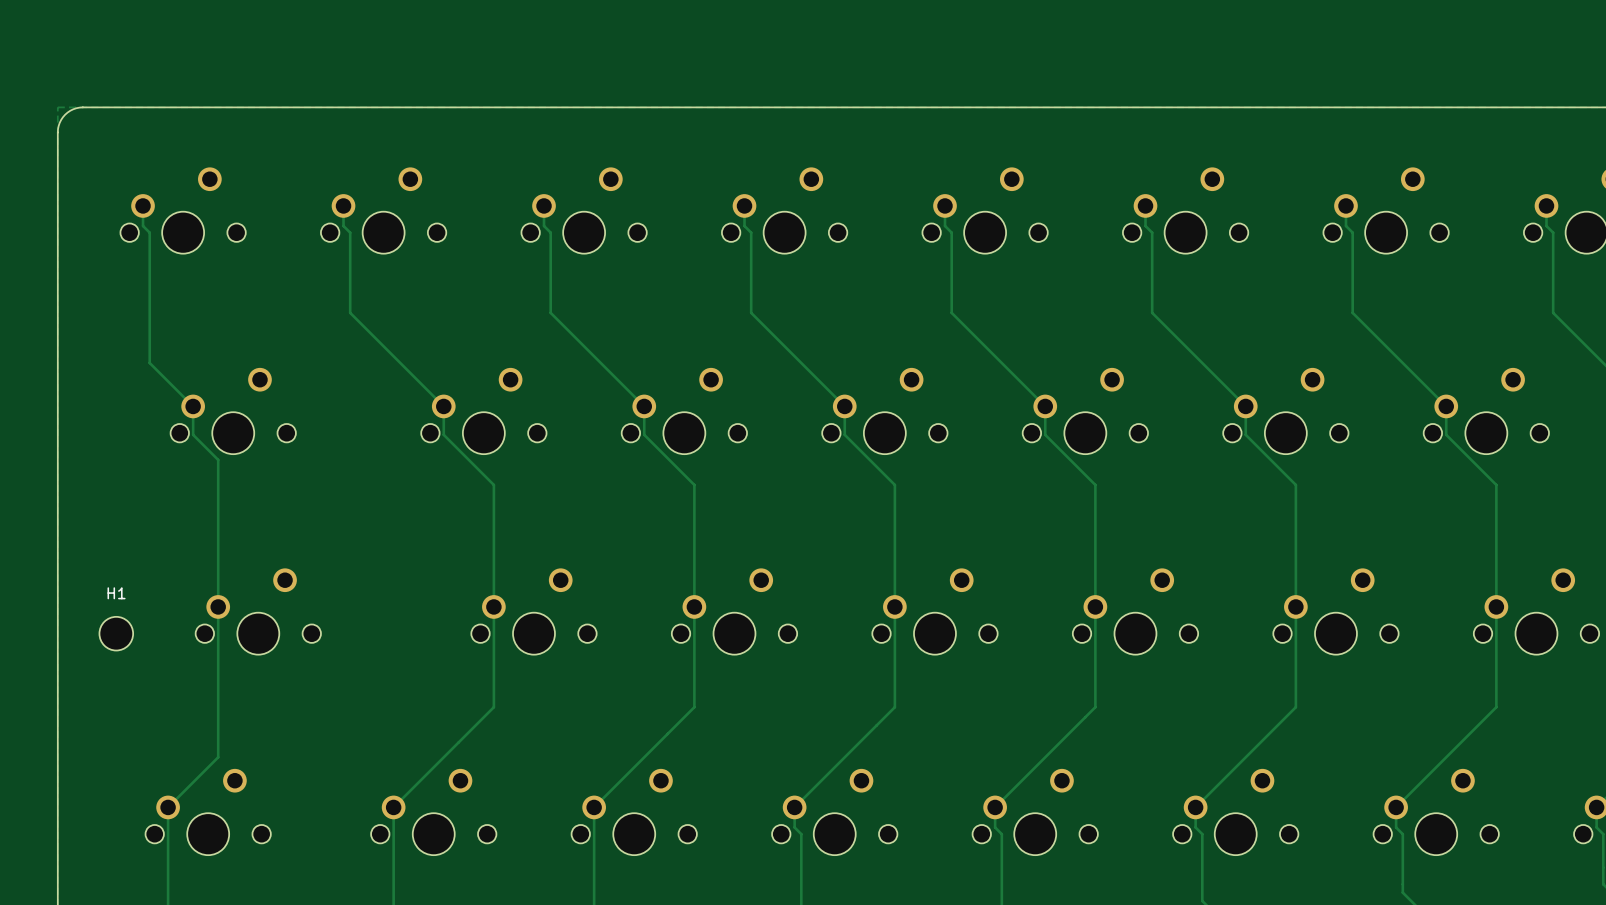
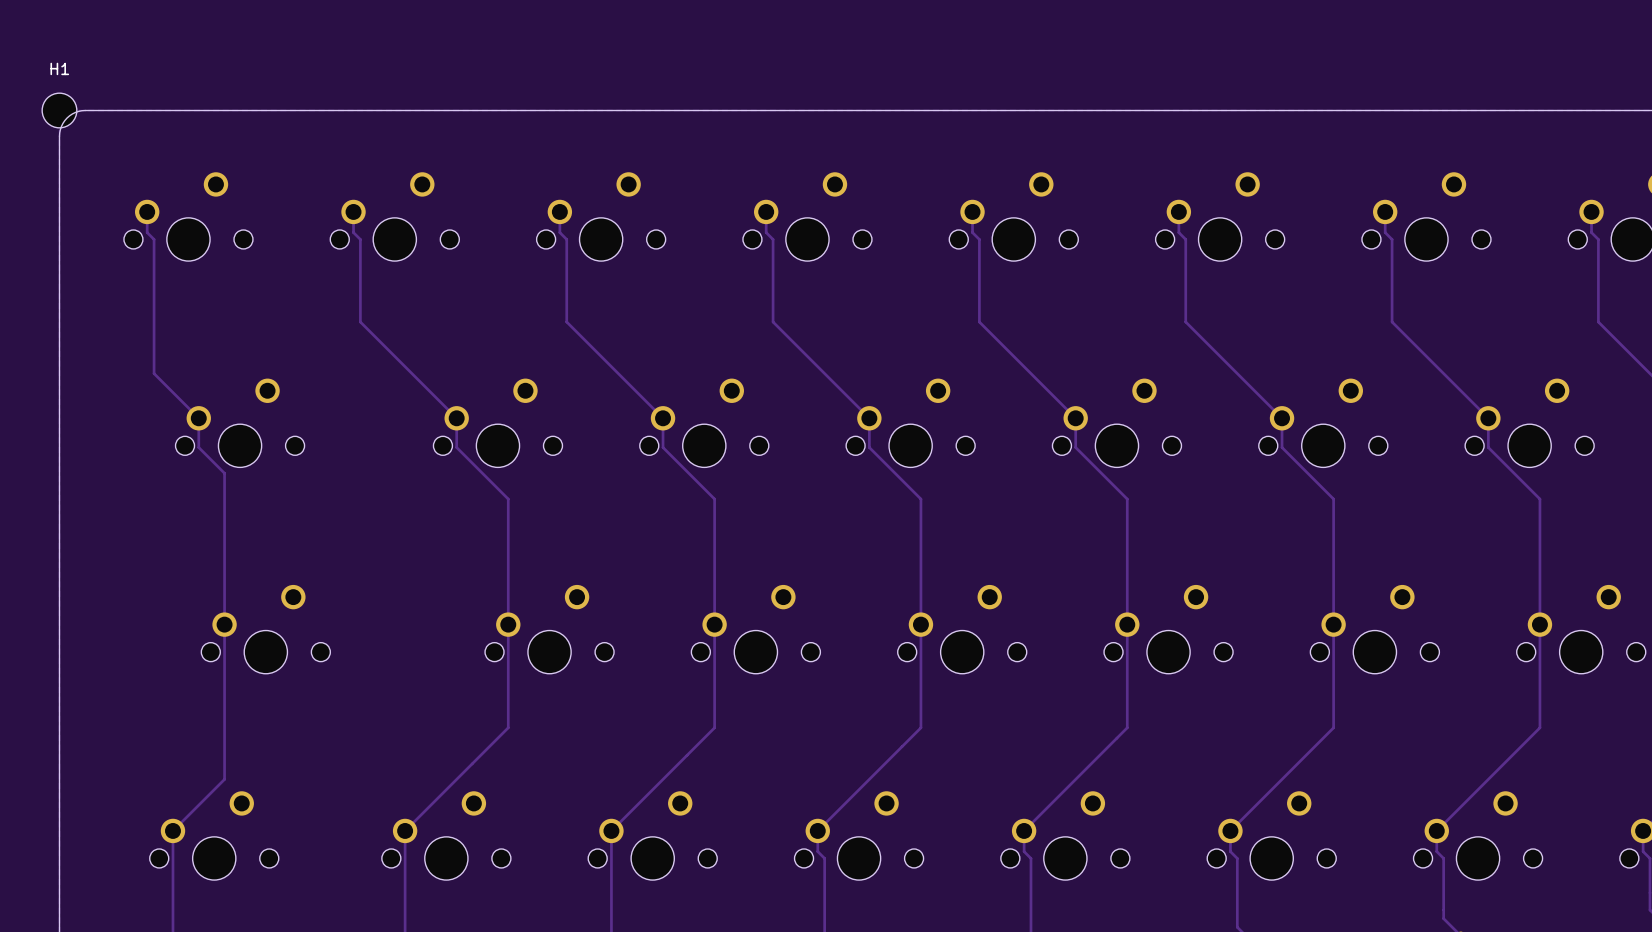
H1 position: (116, 633) -> (59, 110)

